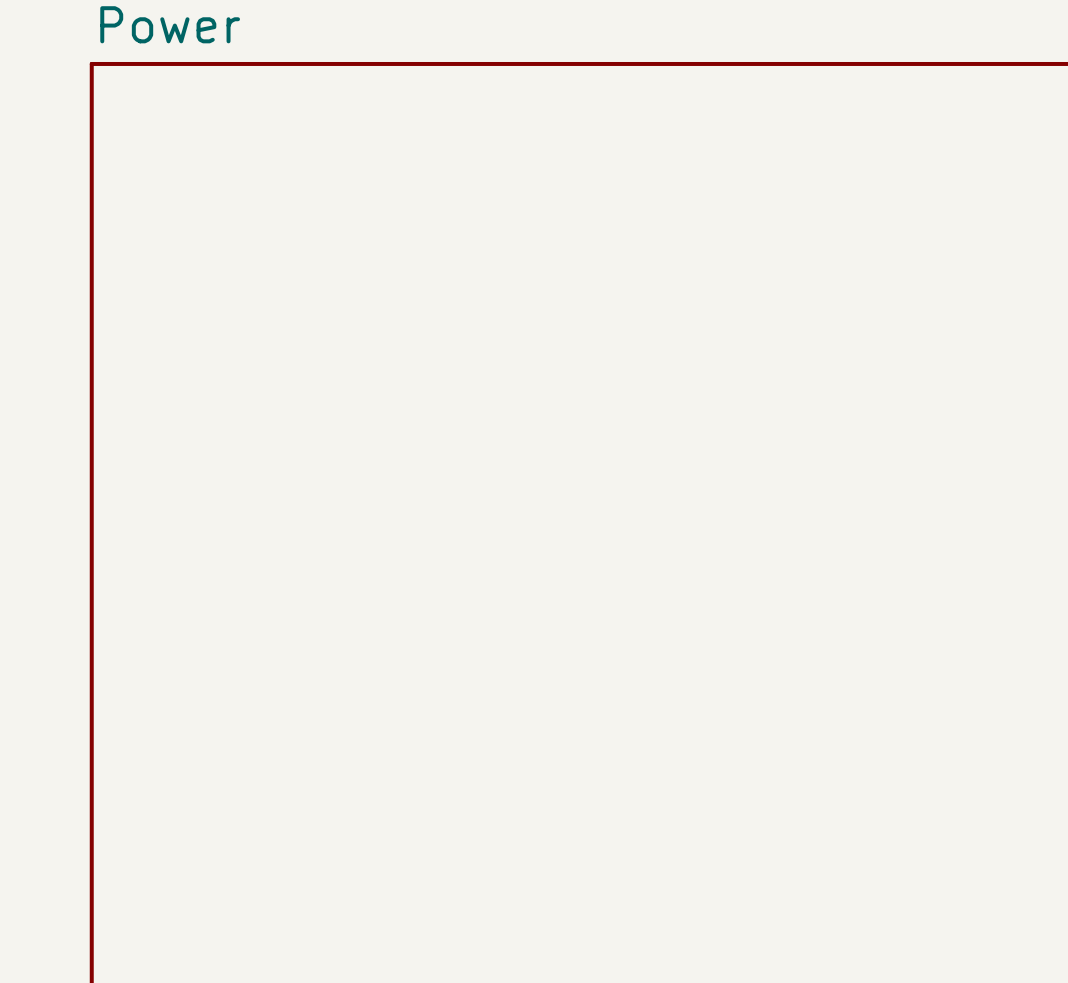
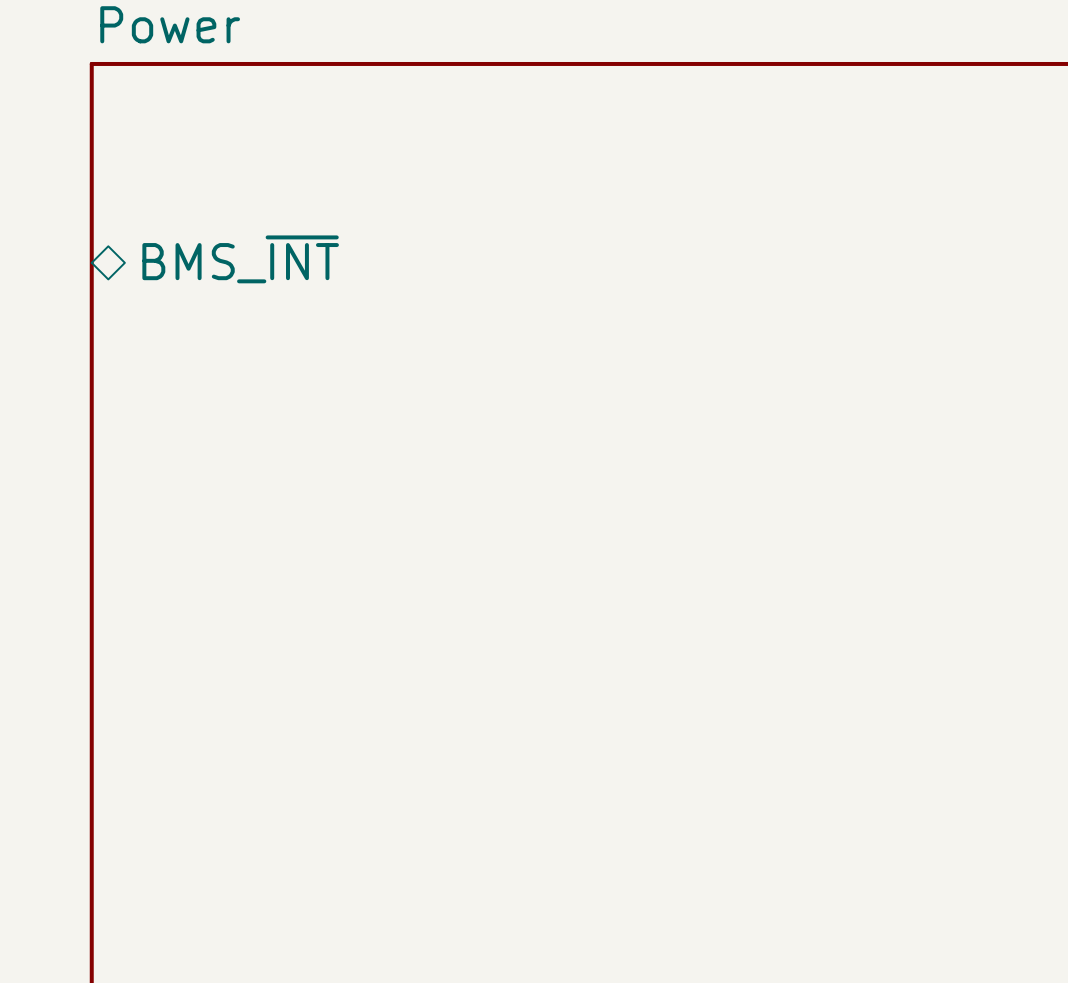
sheet pin: none -> BMS_~{INT} (240, 259)

